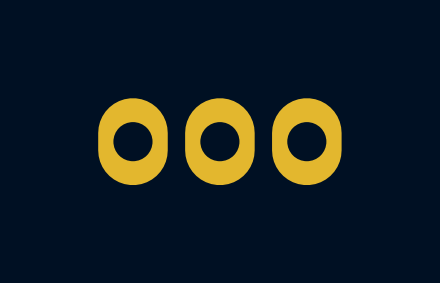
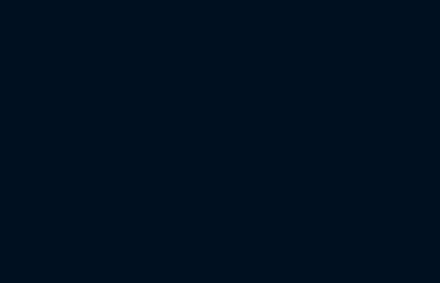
part: (219, 141) -> none

